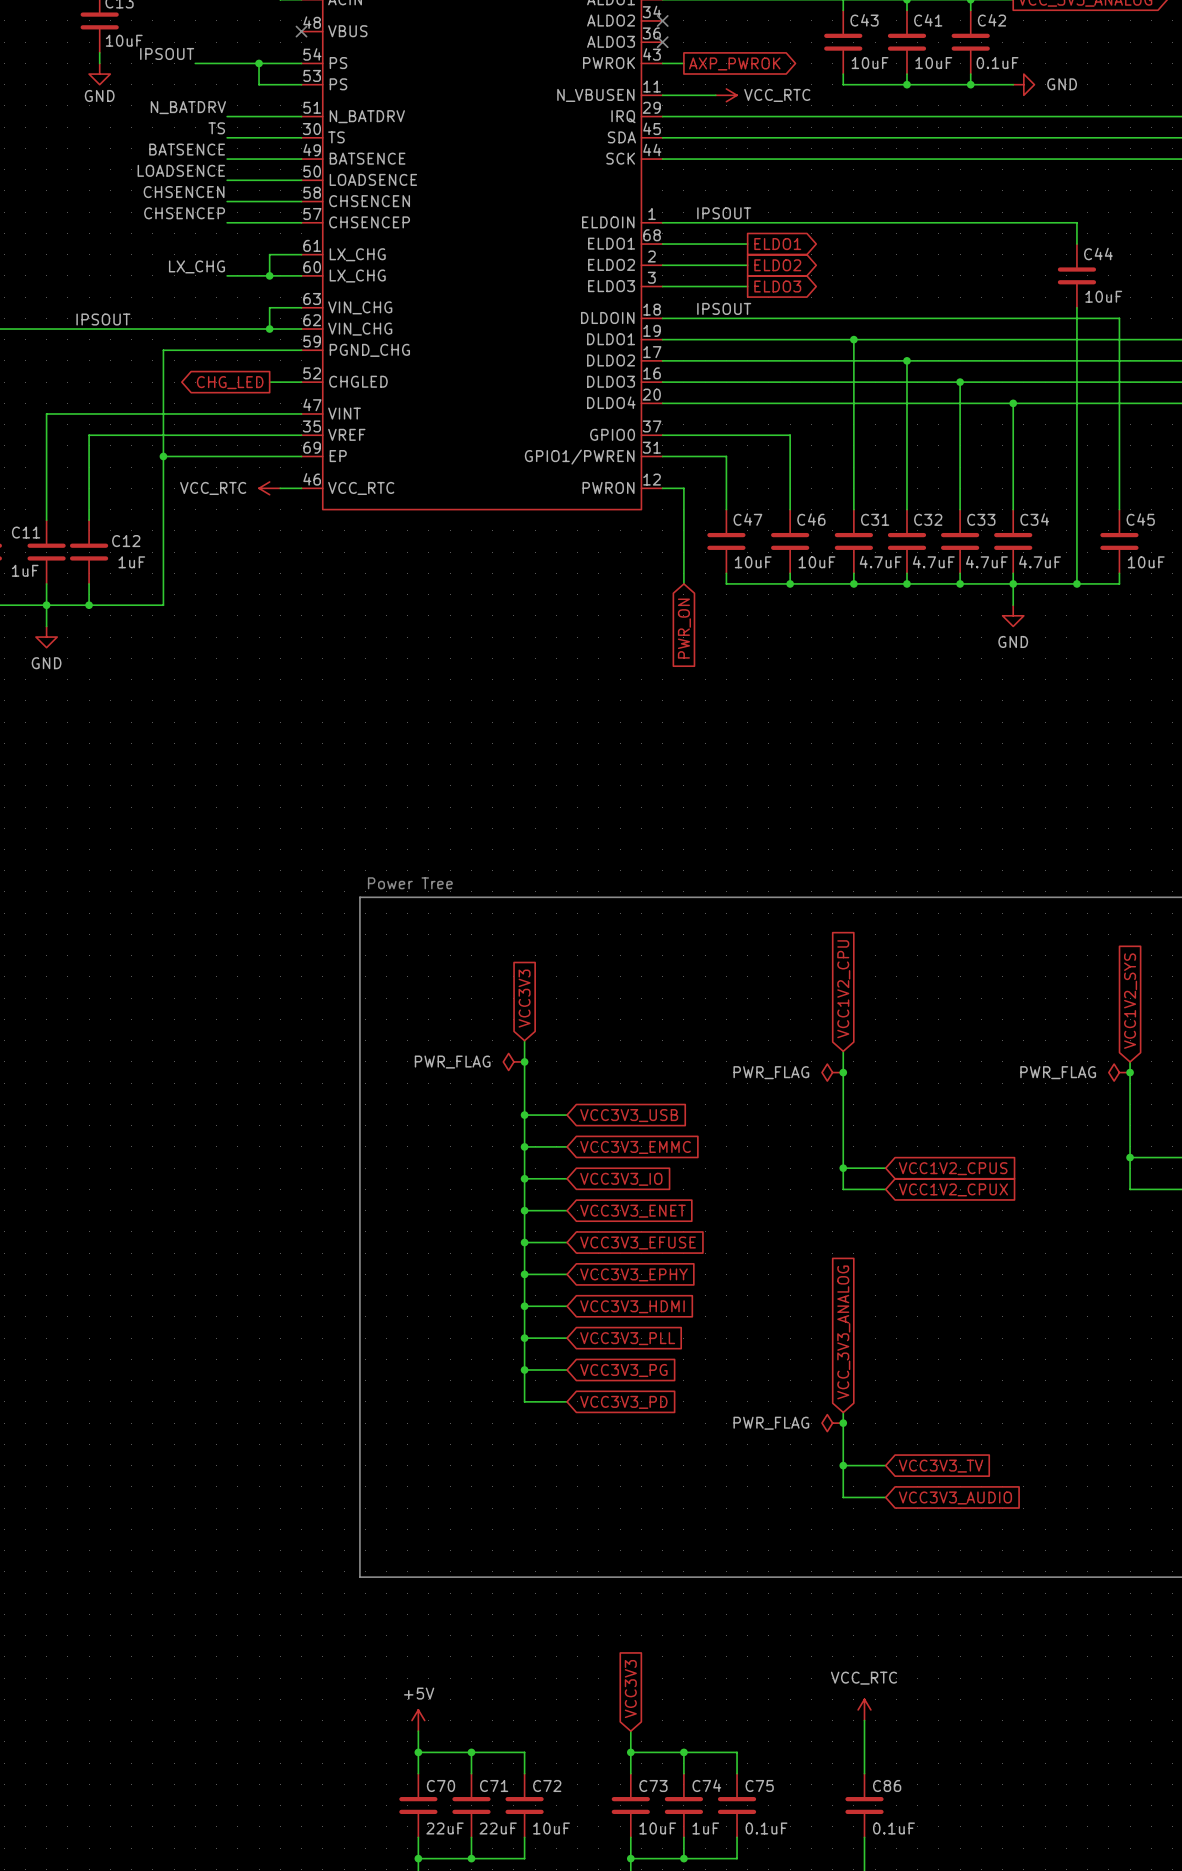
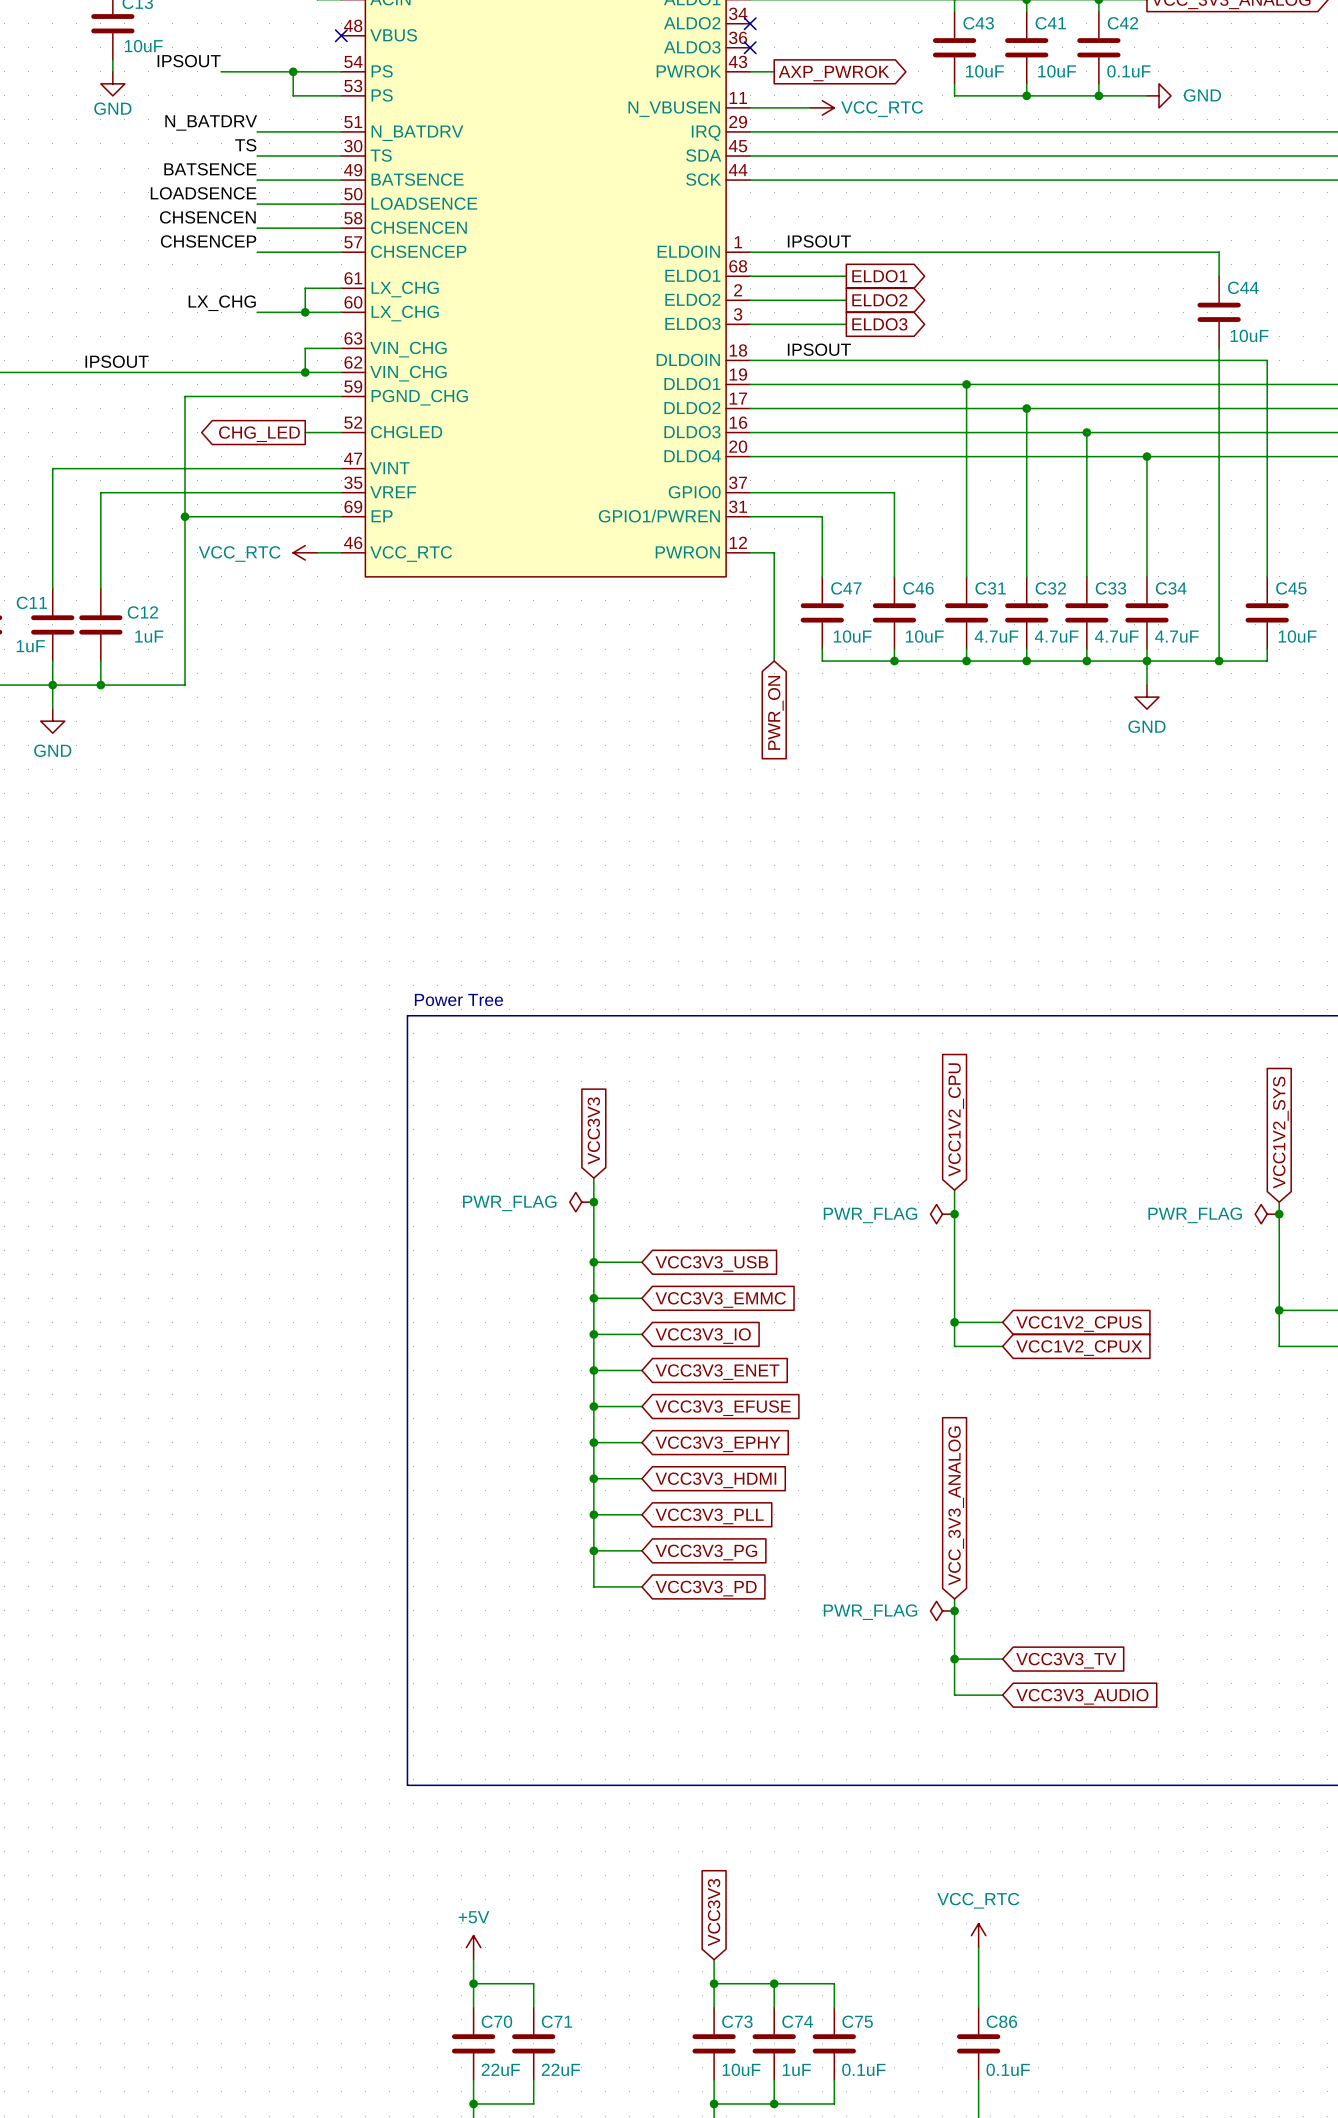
wire: (471, 1752) (524, 1752) (524, 1773) -> none
junction: (471, 1752) -> none
C72: 10uF (524, 1805) -> none
wire: (524, 1837) (524, 1858) (471, 1858) -> none
junction: (471, 1858) -> none

